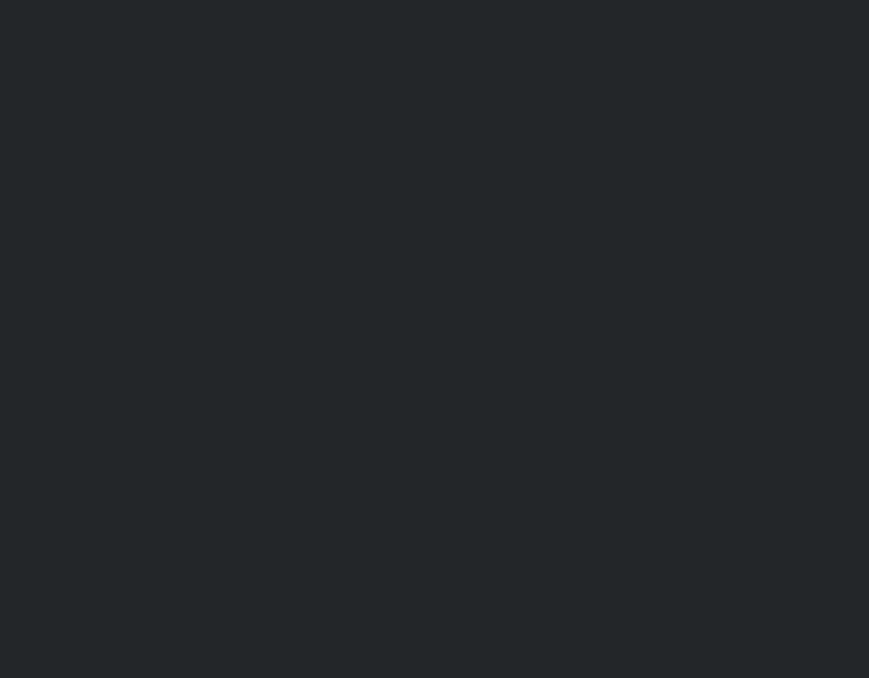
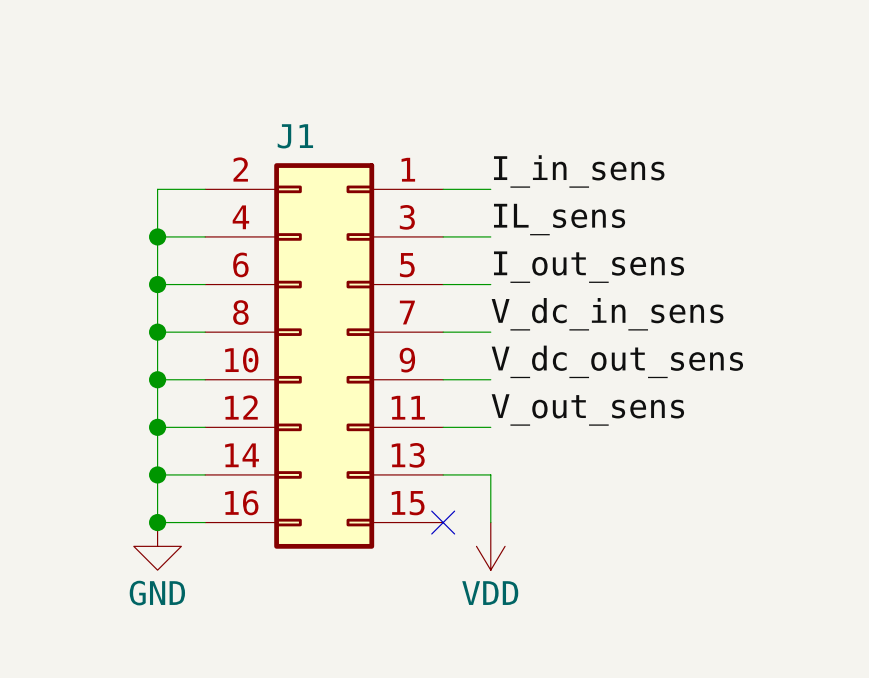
label: none -> I_in_sens (579, 171)
wire: none -> (205, 189) (157, 189) (157, 522) (205, 522)
wire: none -> (443, 189) (490, 189)
label: none -> IL_sens (559, 219)
wire: none -> (157, 236) (205, 236)
junction: none -> (157, 236)
wire: none -> (443, 236) (490, 236)
label: none -> I_out_sens (589, 267)
wire: none -> (157, 284) (205, 284)
junction: none -> (157, 284)
wire: none -> (443, 284) (490, 284)
label: none -> V_dc_in_sens (607, 314)
wire: none -> (157, 332) (205, 332)
junction: none -> (157, 332)
wire: none -> (443, 332) (490, 332)
J1: none -> (324, 355)
label: none -> V_dc_out_sens (617, 361)
wire: none -> (157, 379) (205, 379)
junction: none -> (157, 379)
wire: none -> (443, 379) (490, 379)
label: none -> V_out_sens (587, 409)
wire: none -> (157, 427) (205, 427)
junction: none -> (157, 427)
wire: none -> (443, 427) (490, 427)
wire: none -> (157, 474) (205, 474)
junction: none -> (157, 474)
wire: none -> (443, 474) (490, 474) (490, 522)
junction: none -> (157, 522)
no-connect mark: none -> (443, 522)
power symbol: none -> GND (157, 546)
power symbol: none -> VDD (490, 546)

